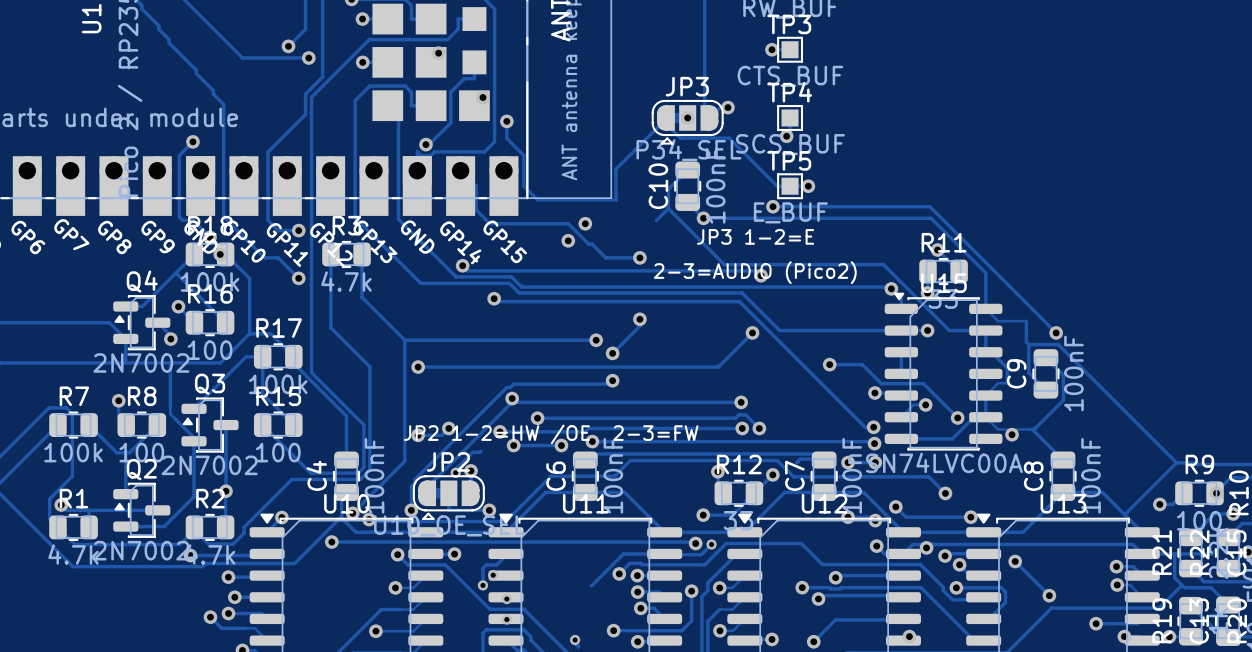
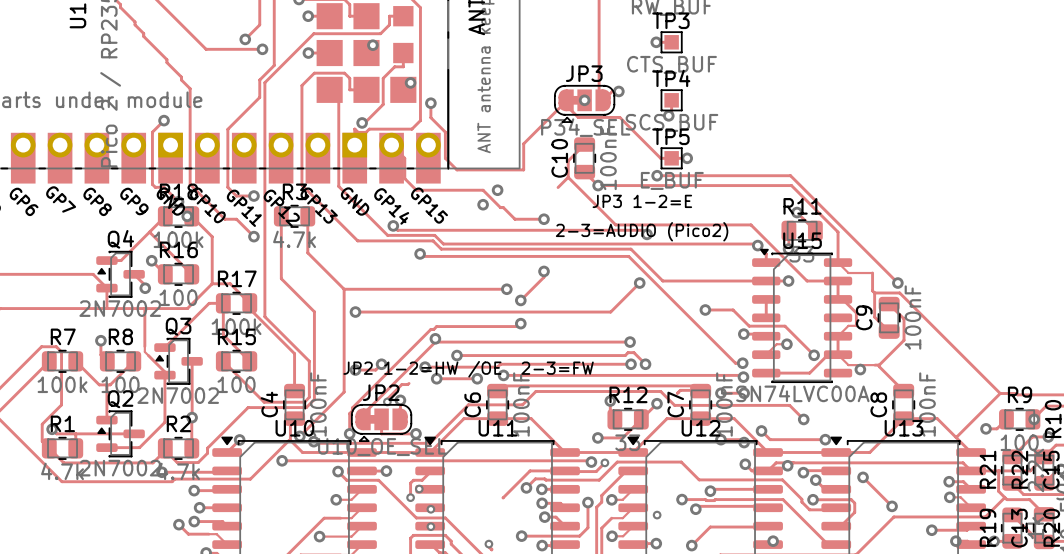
via: none -> (657, 515)

